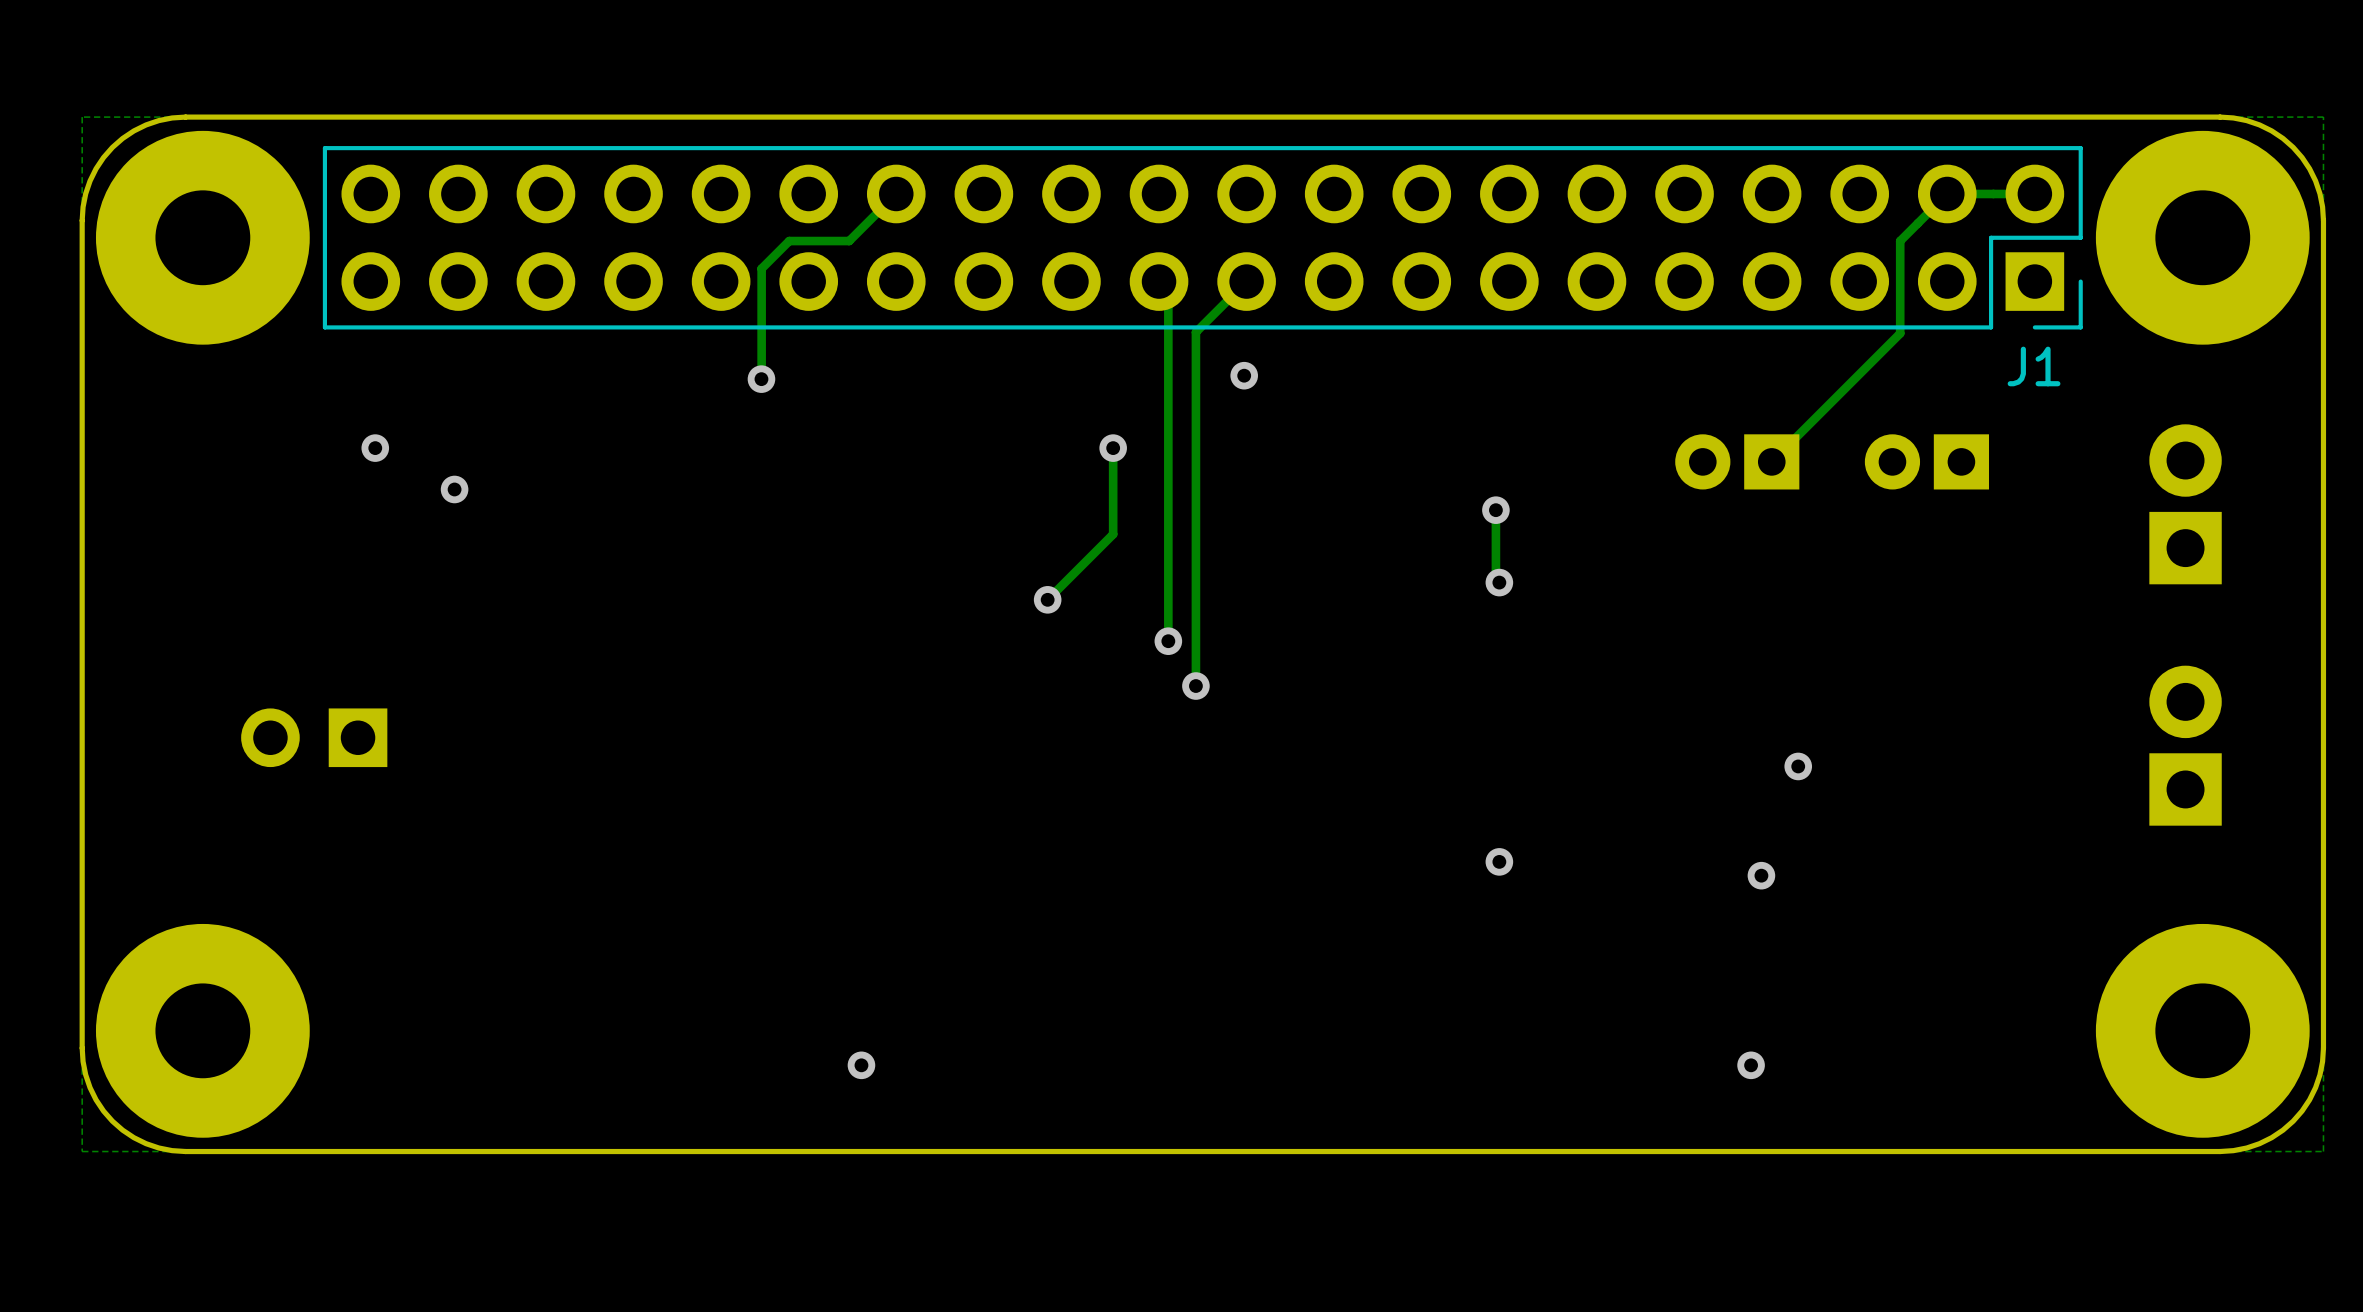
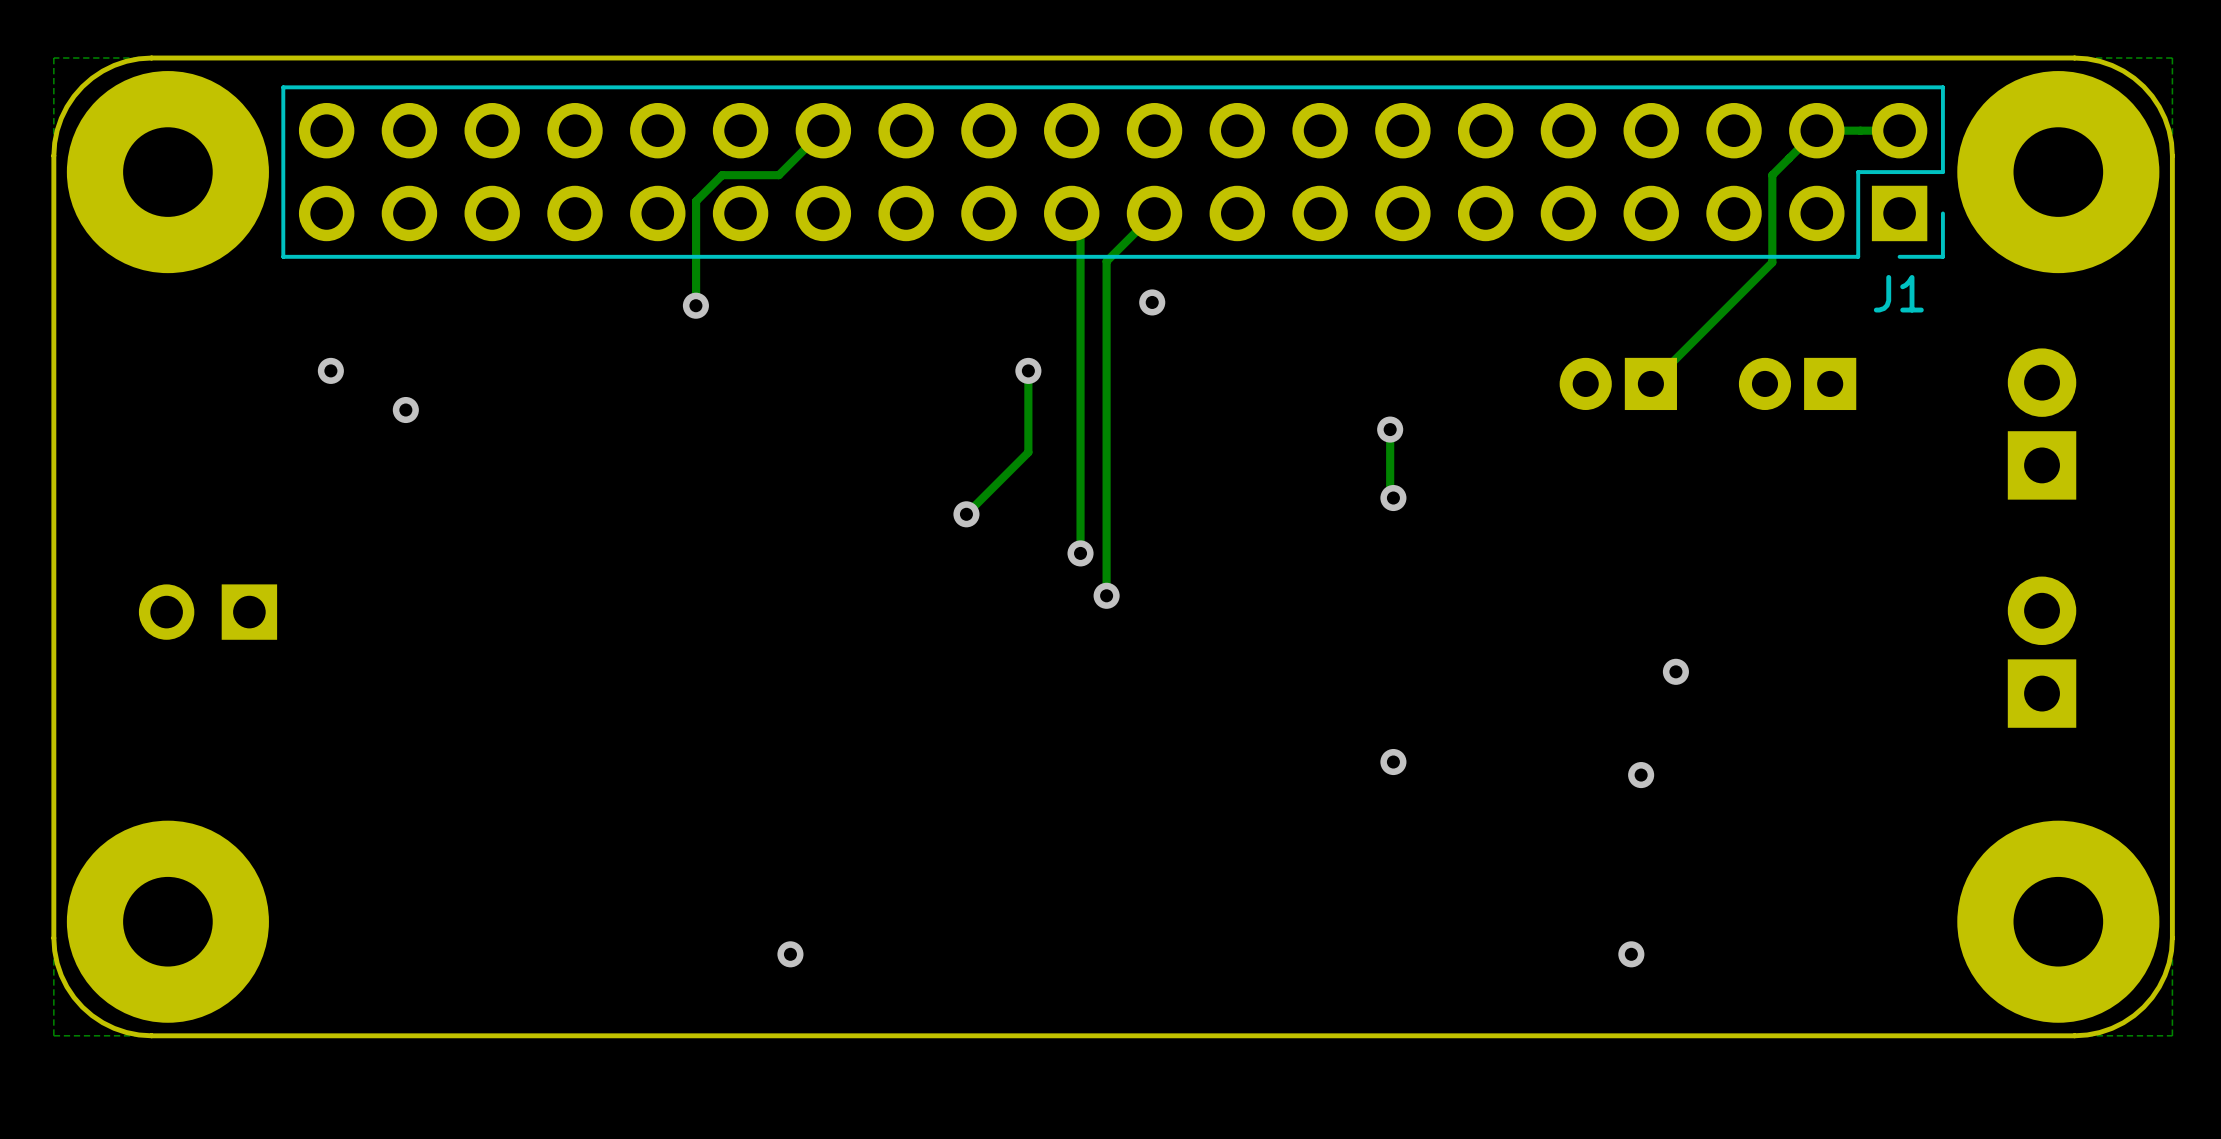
part position: (314, 737) -> (208, 612)

